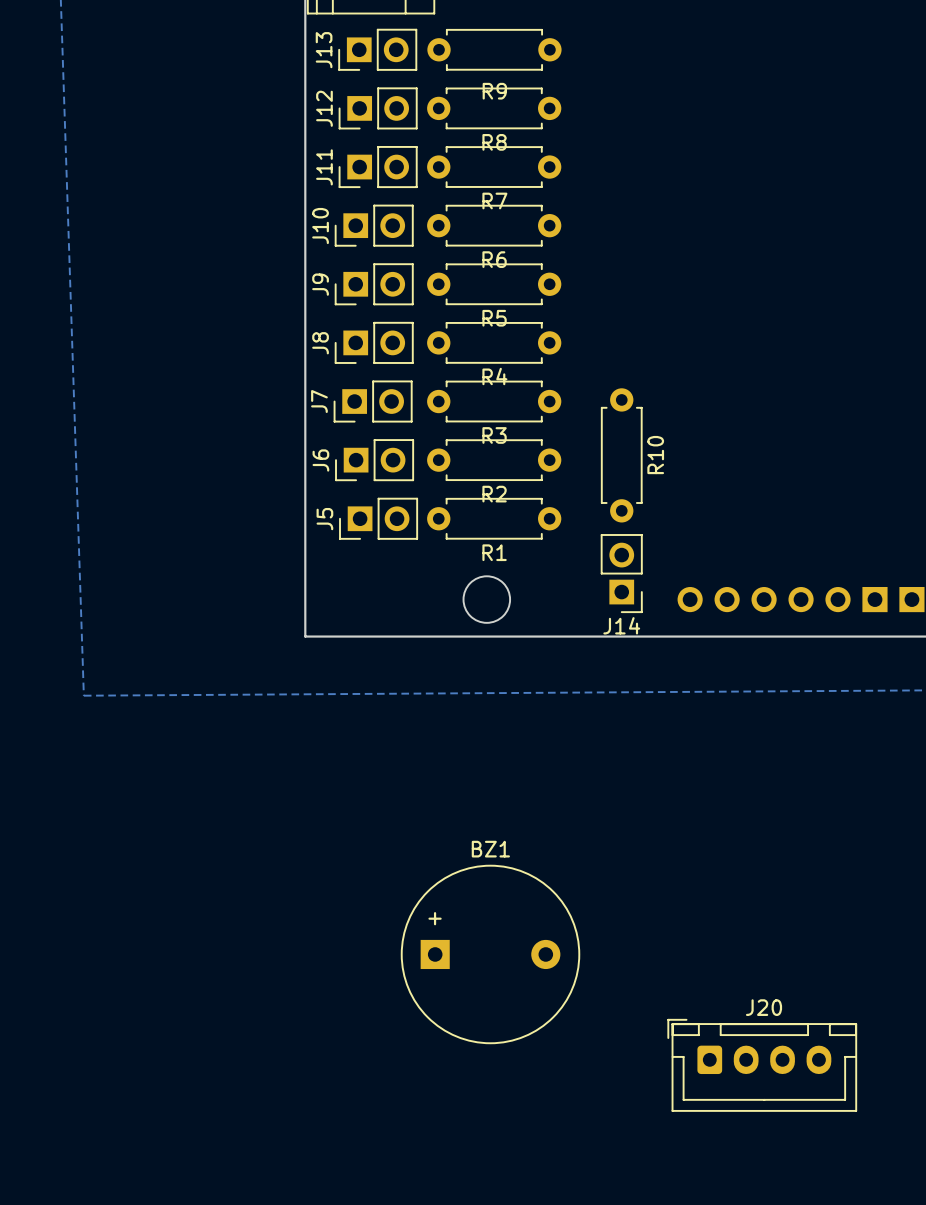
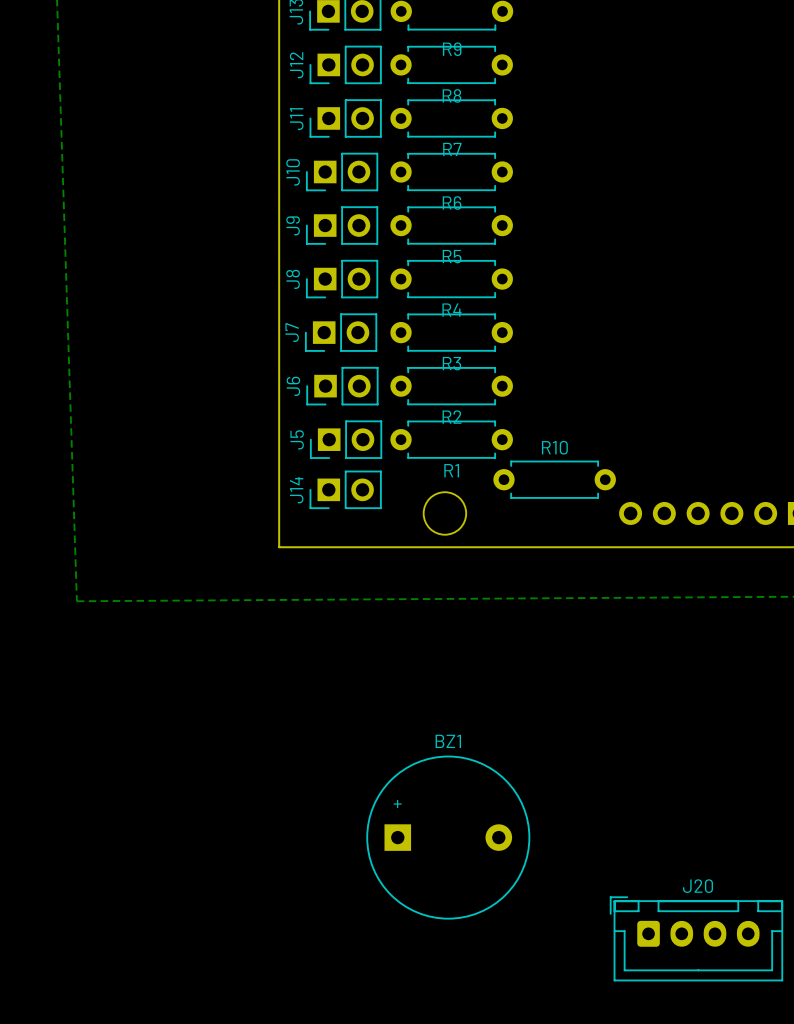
R10 rotation: 0° (621, 455) -> 90° clockwise (554, 479)
R10 position: (621, 455) -> (554, 479)
R10 name position: R10 (655, 455) -> R10 (554, 447)
J14 rotation: 0° (621, 573) -> 90° clockwise (345, 489)
J14 position: (621, 573) -> (345, 489)

